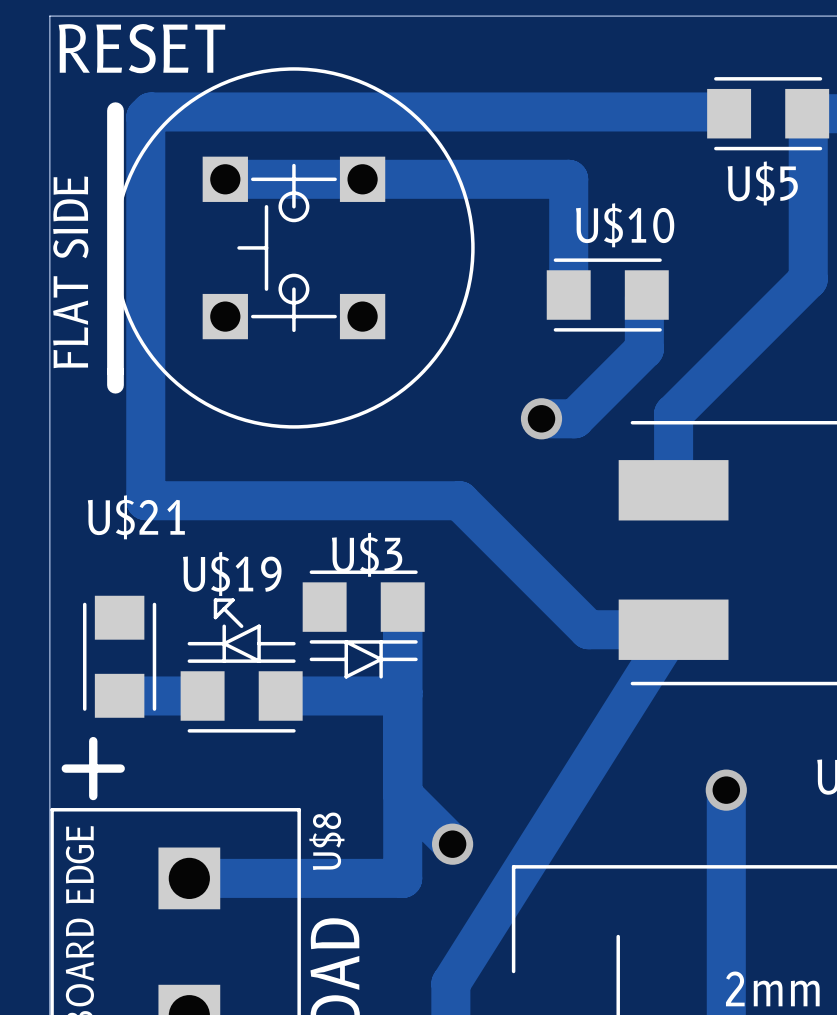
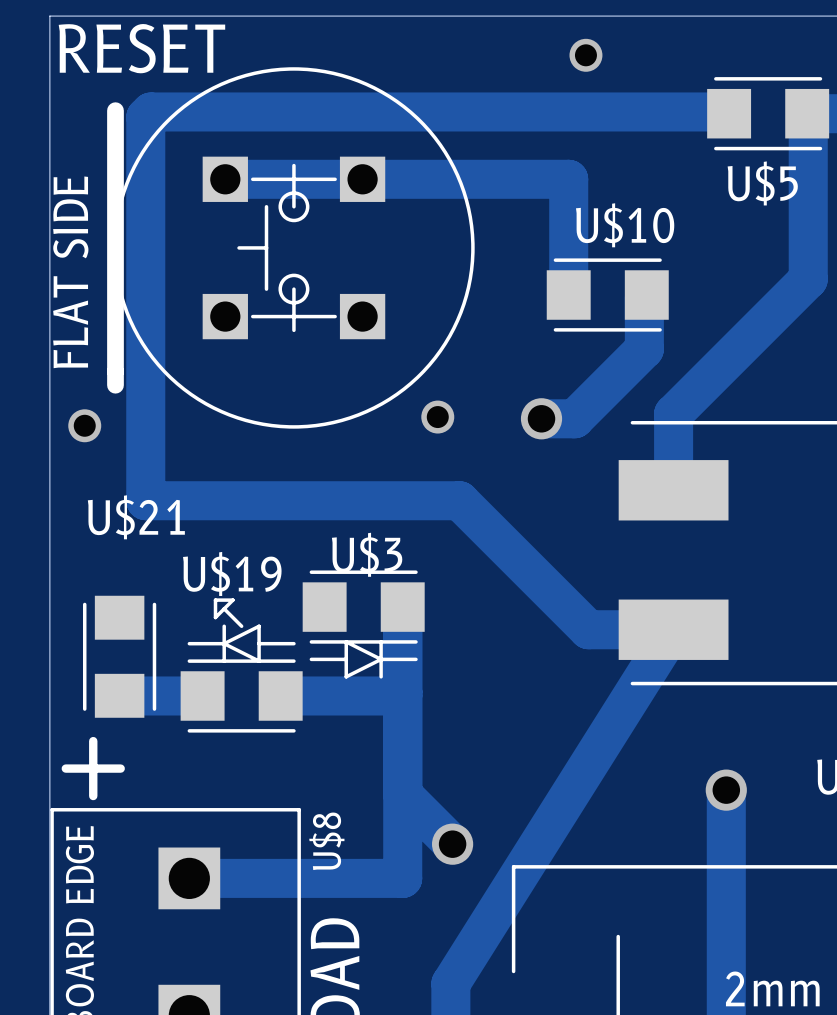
via: none -> (585, 55)
via: none -> (437, 417)
via: none -> (84, 425)

